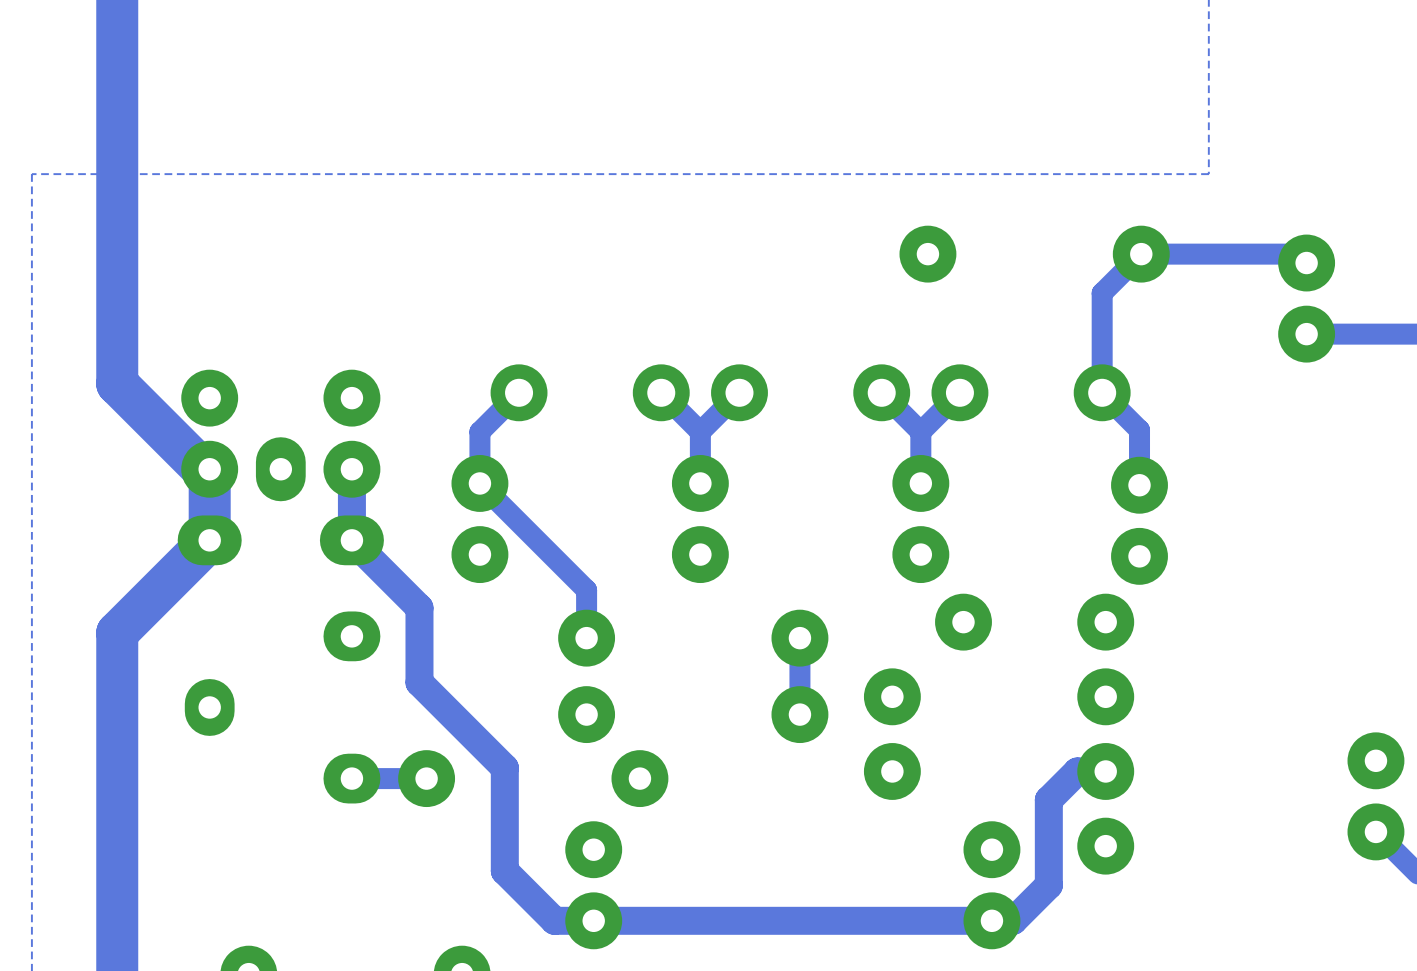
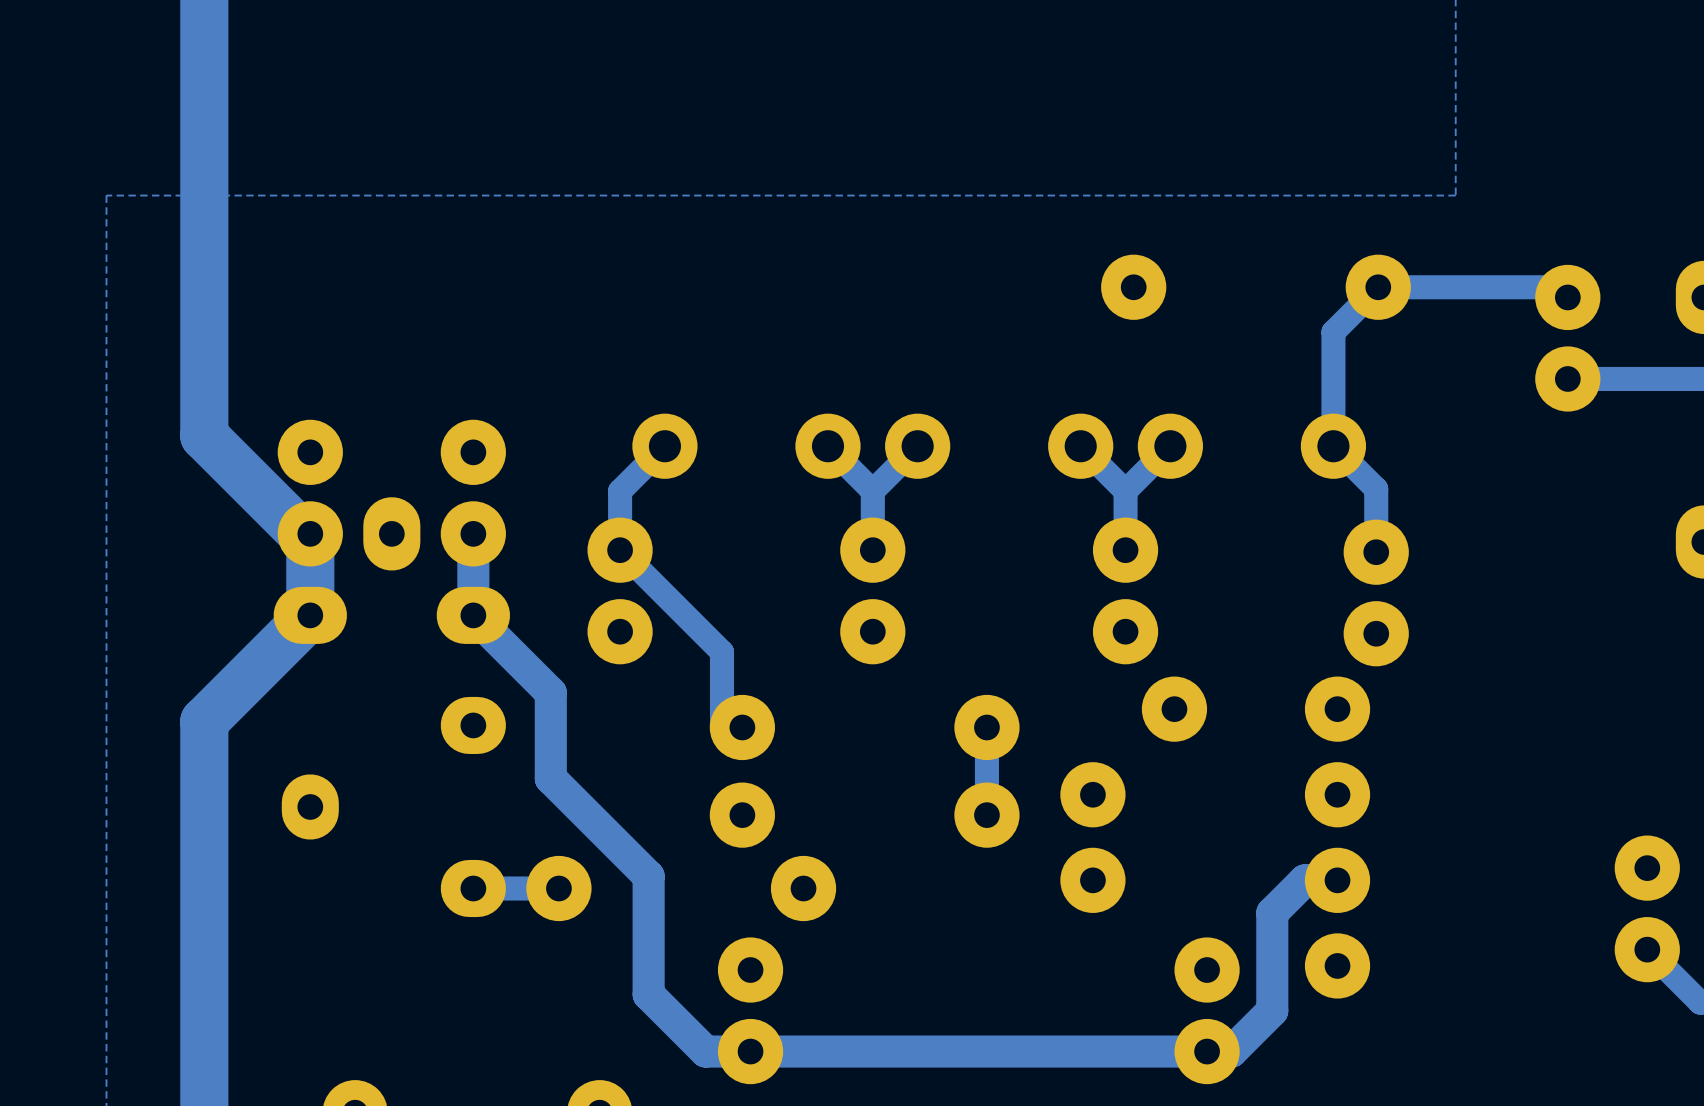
track: (568, 572) (586, 590) (586, 638) -> (722, 652) (722, 727)

